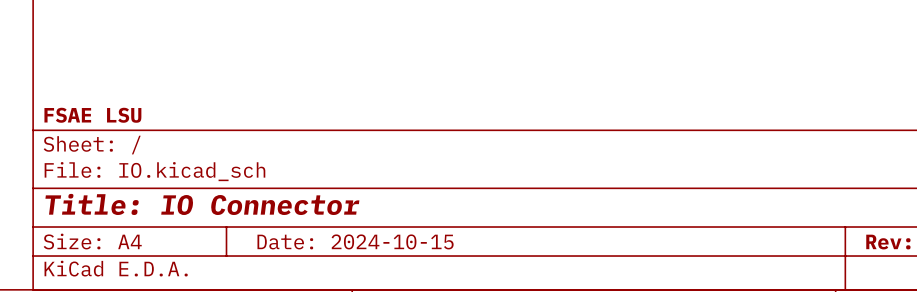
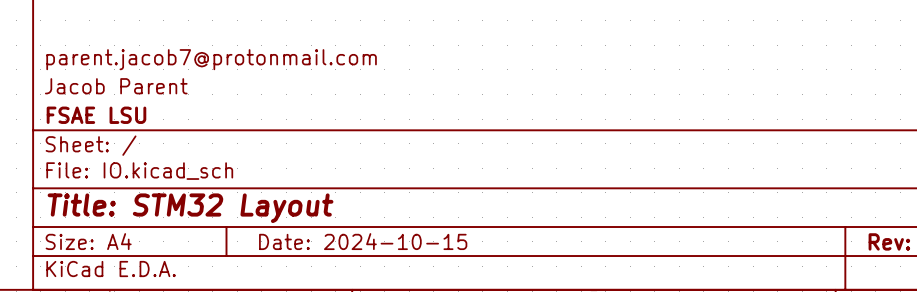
title block: none -> parent.jacob7@protonmail.com (211, 59)
title block: none -> Jacob Parent (116, 86)
title block: Title: IO Connector (202, 204) -> Title: STM32 Layout (190, 208)

